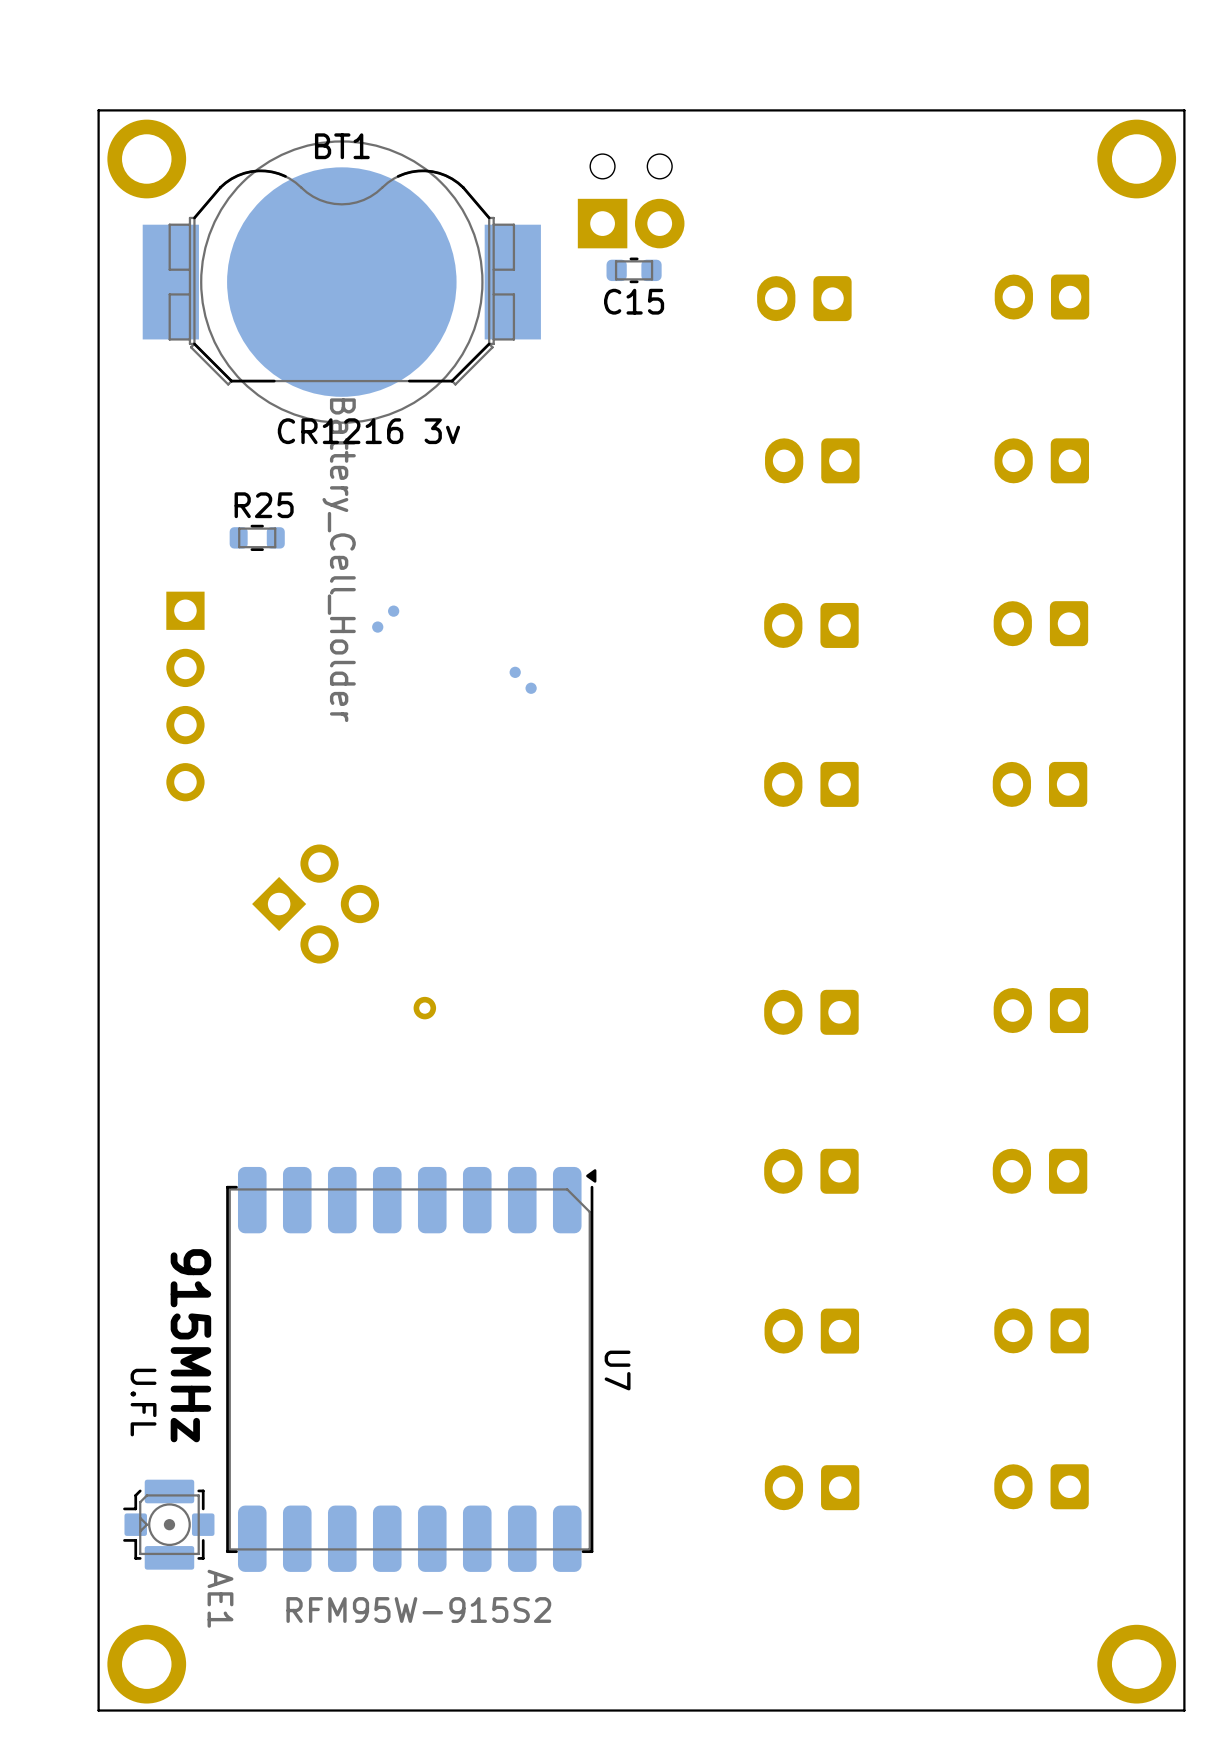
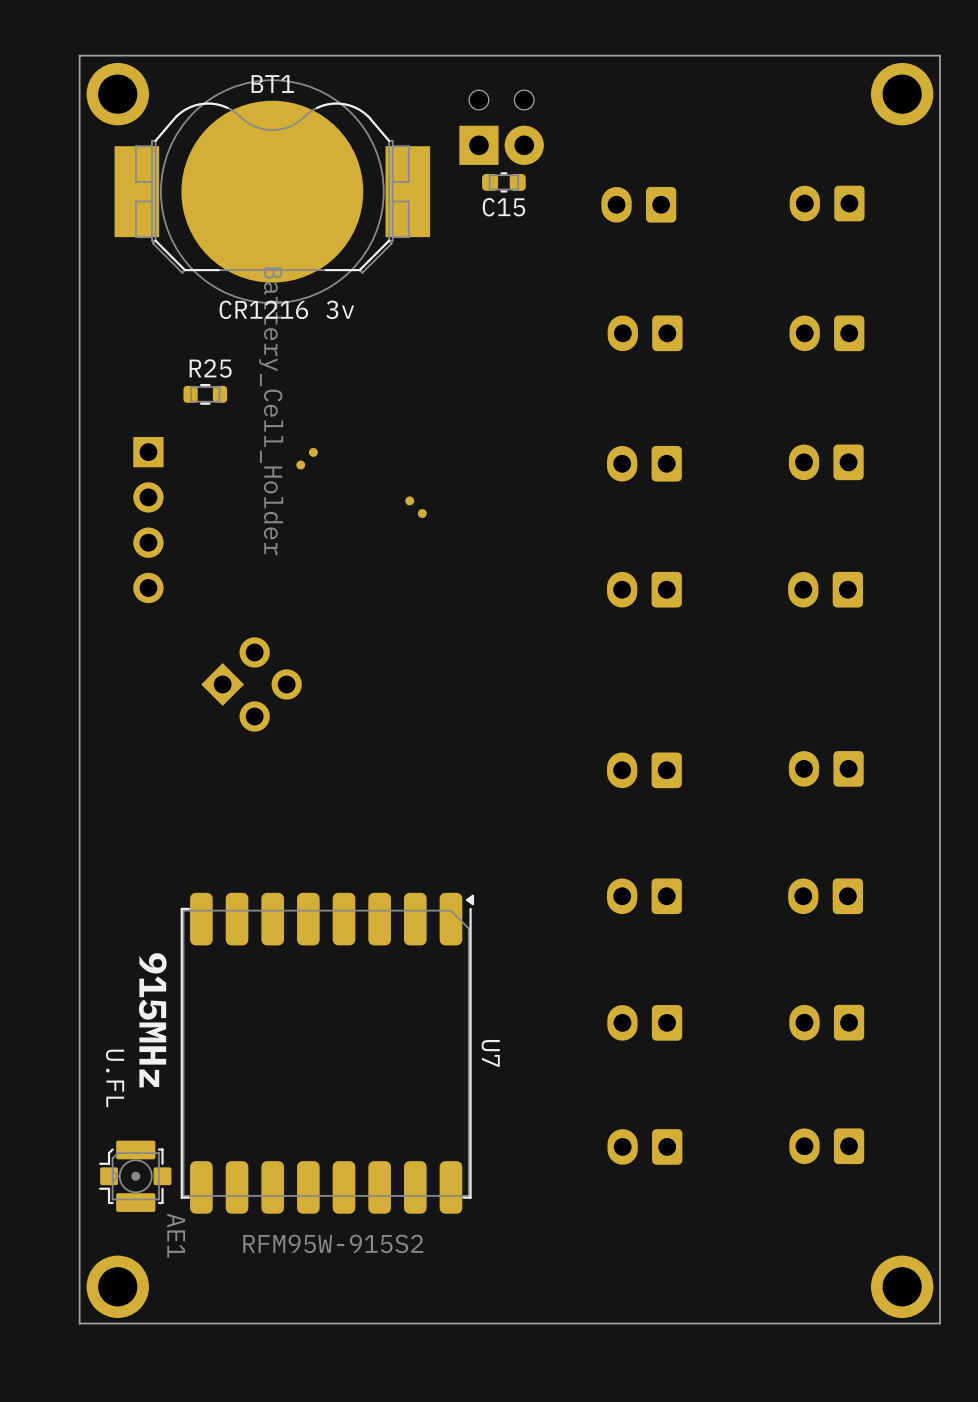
part: (424, 1008) -> none

